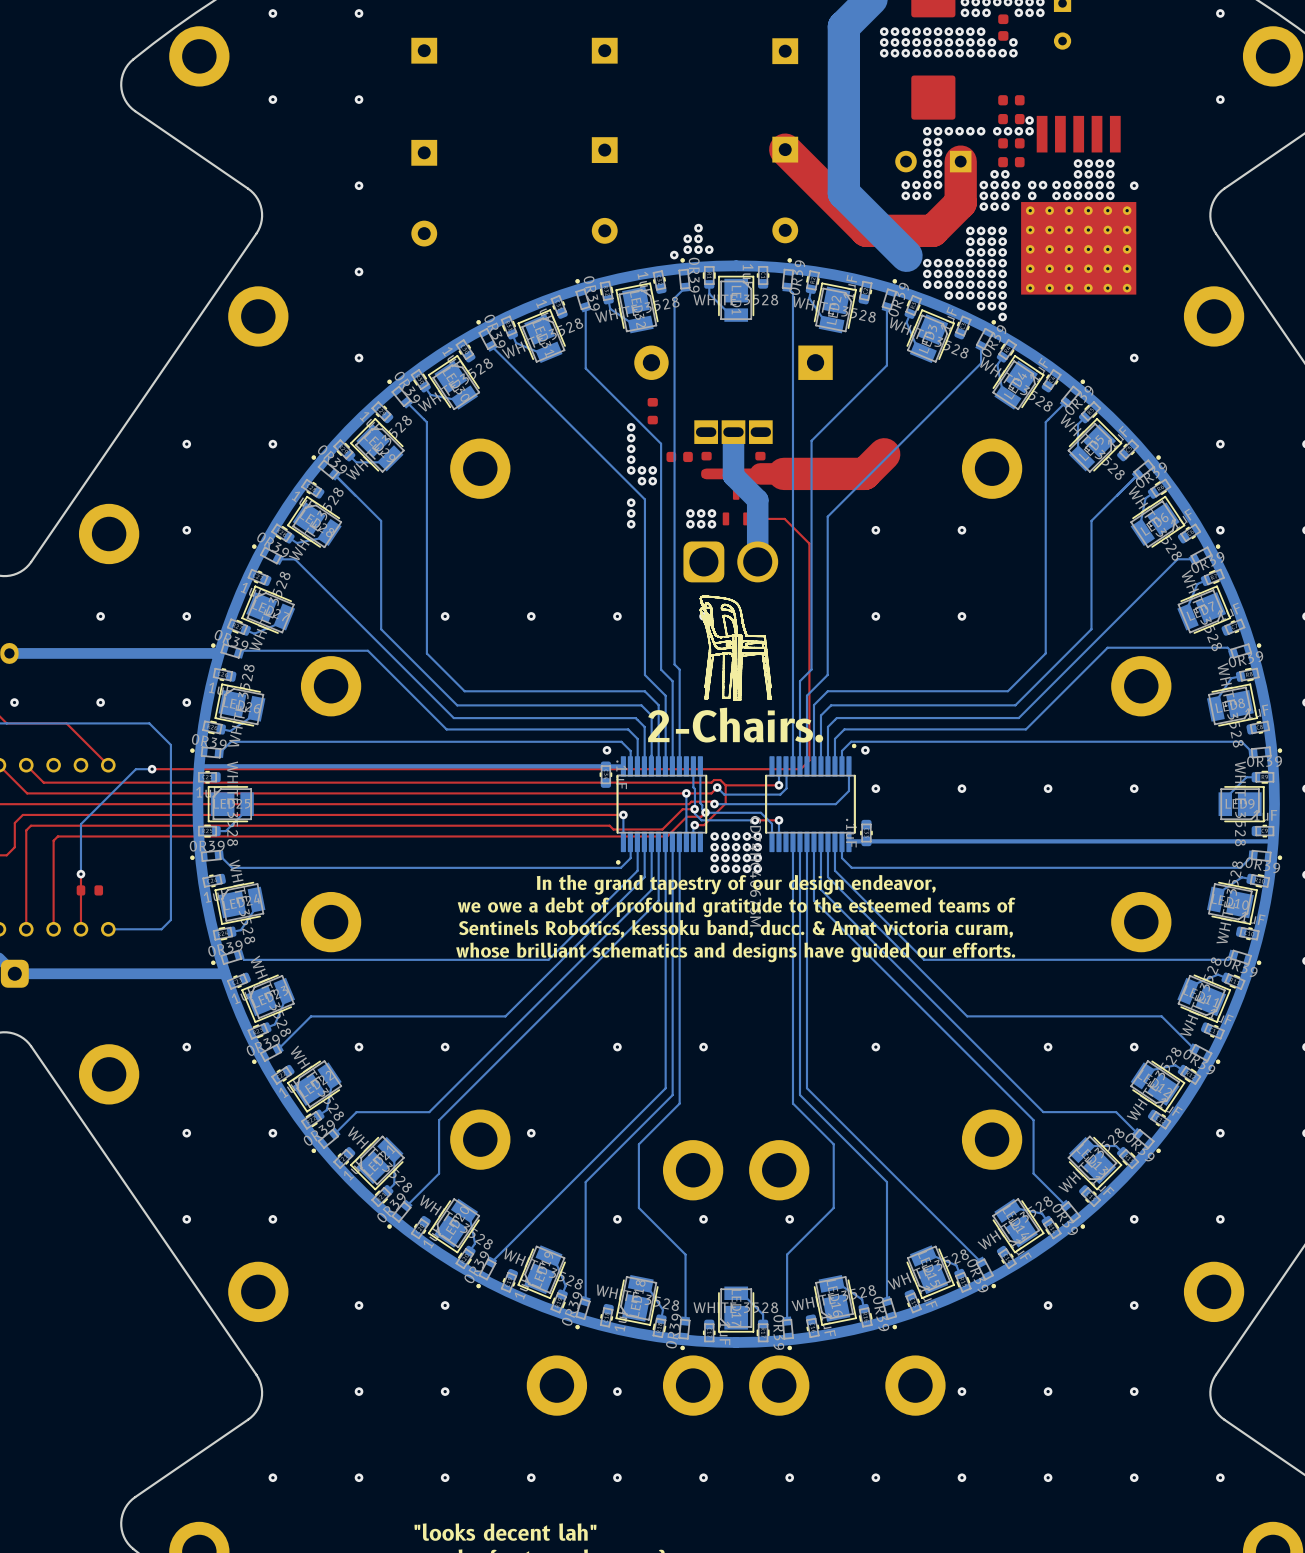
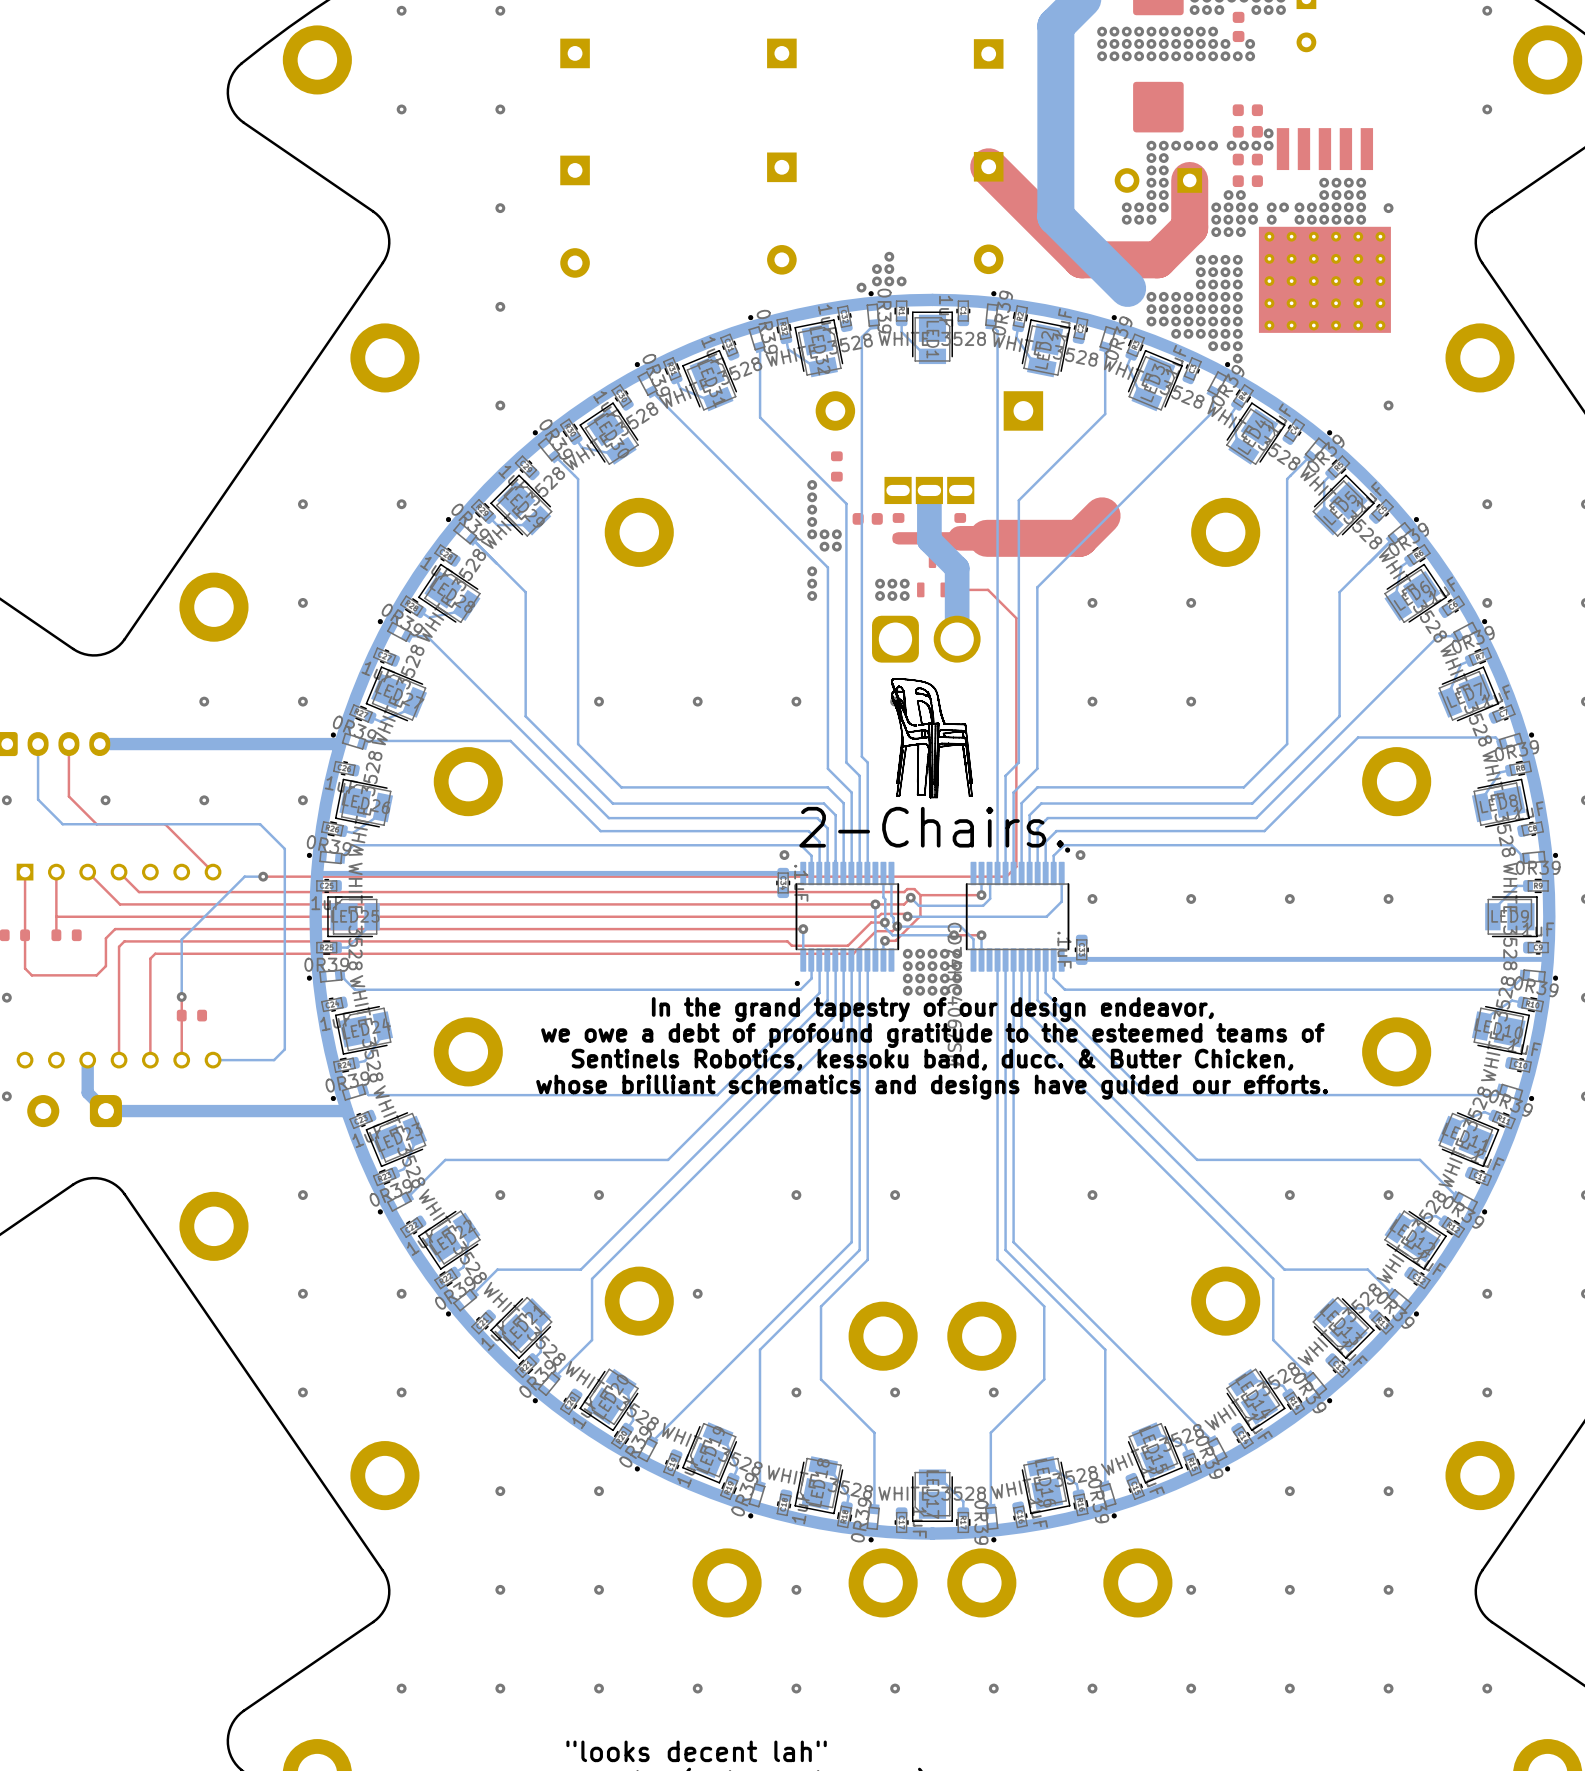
text: Sentinels Robotics, kessoku band, ducc. & Amat victoria curam, (736, 928) -> Sentinels Robotics, kessoku band, ducc. & Butter Chicken, (932, 1059)

